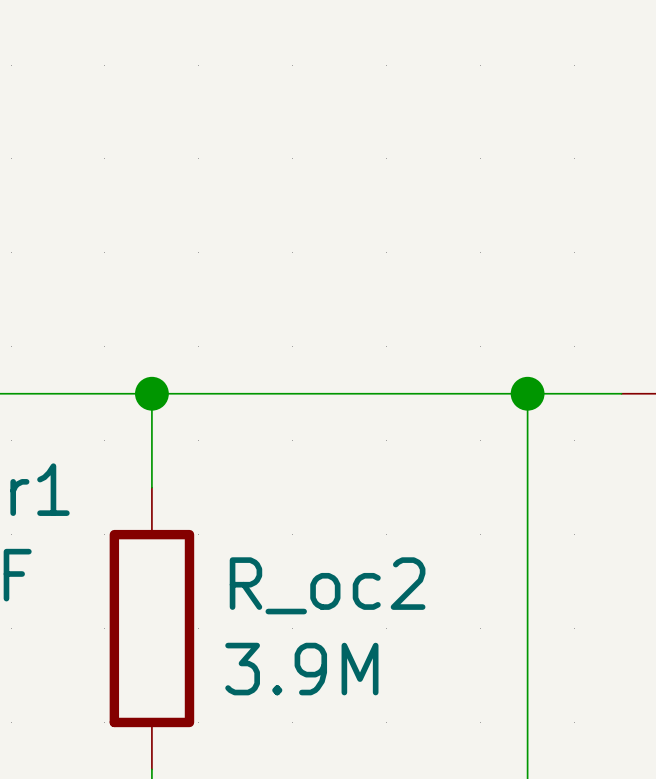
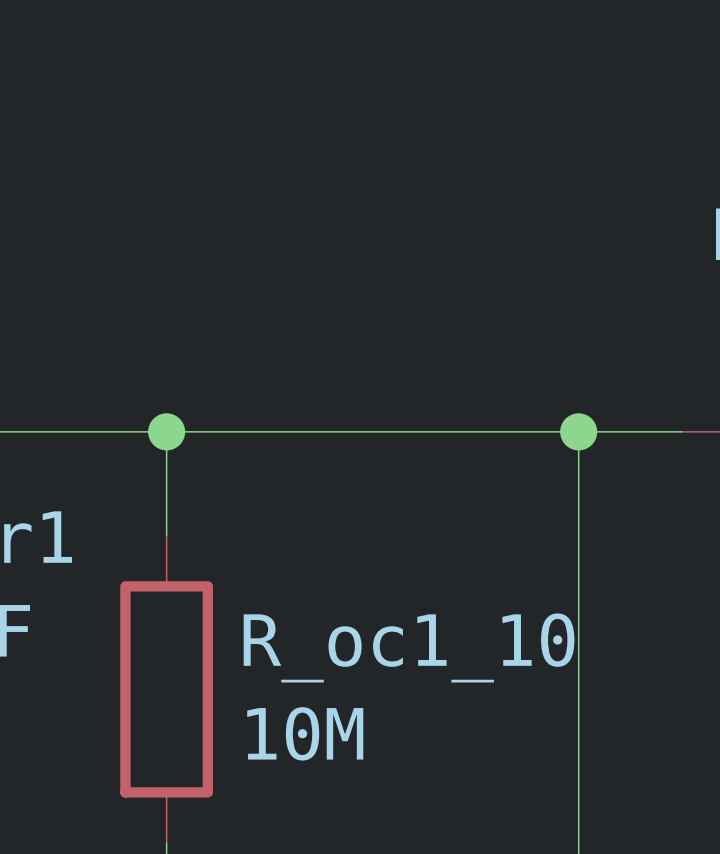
R_oc2 name: R_oc2 (327, 585) -> R_oc1_10 (409, 647)
R_oc2 value: 3.9M (301, 669) -> 10M (305, 733)

